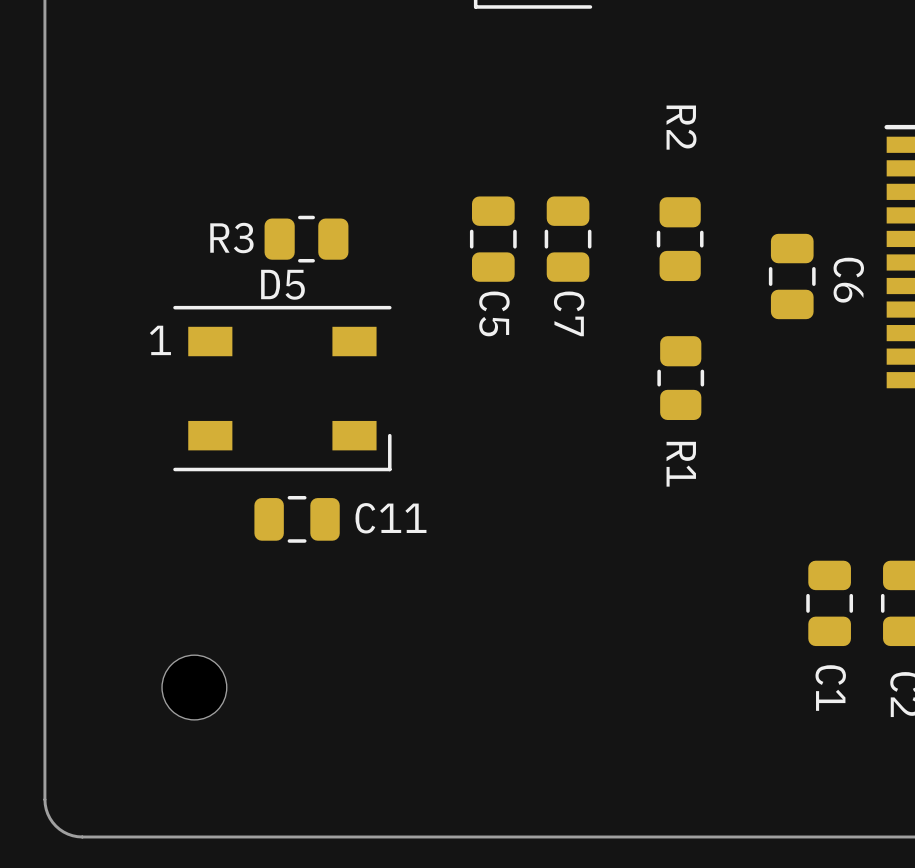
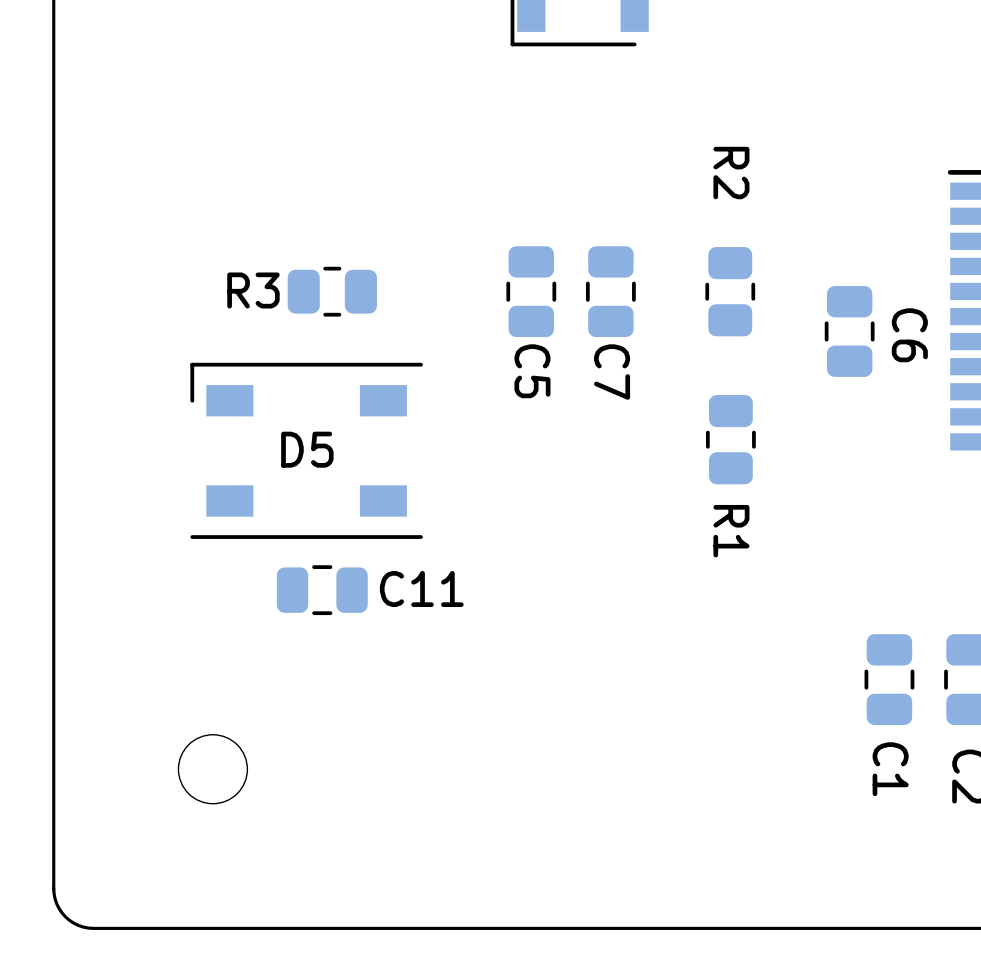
D5 name position: D5 (282, 284) -> D5 (307, 449)
D5 footprint: [173, 305, 392, 472] -> [190, 362, 423, 539]

